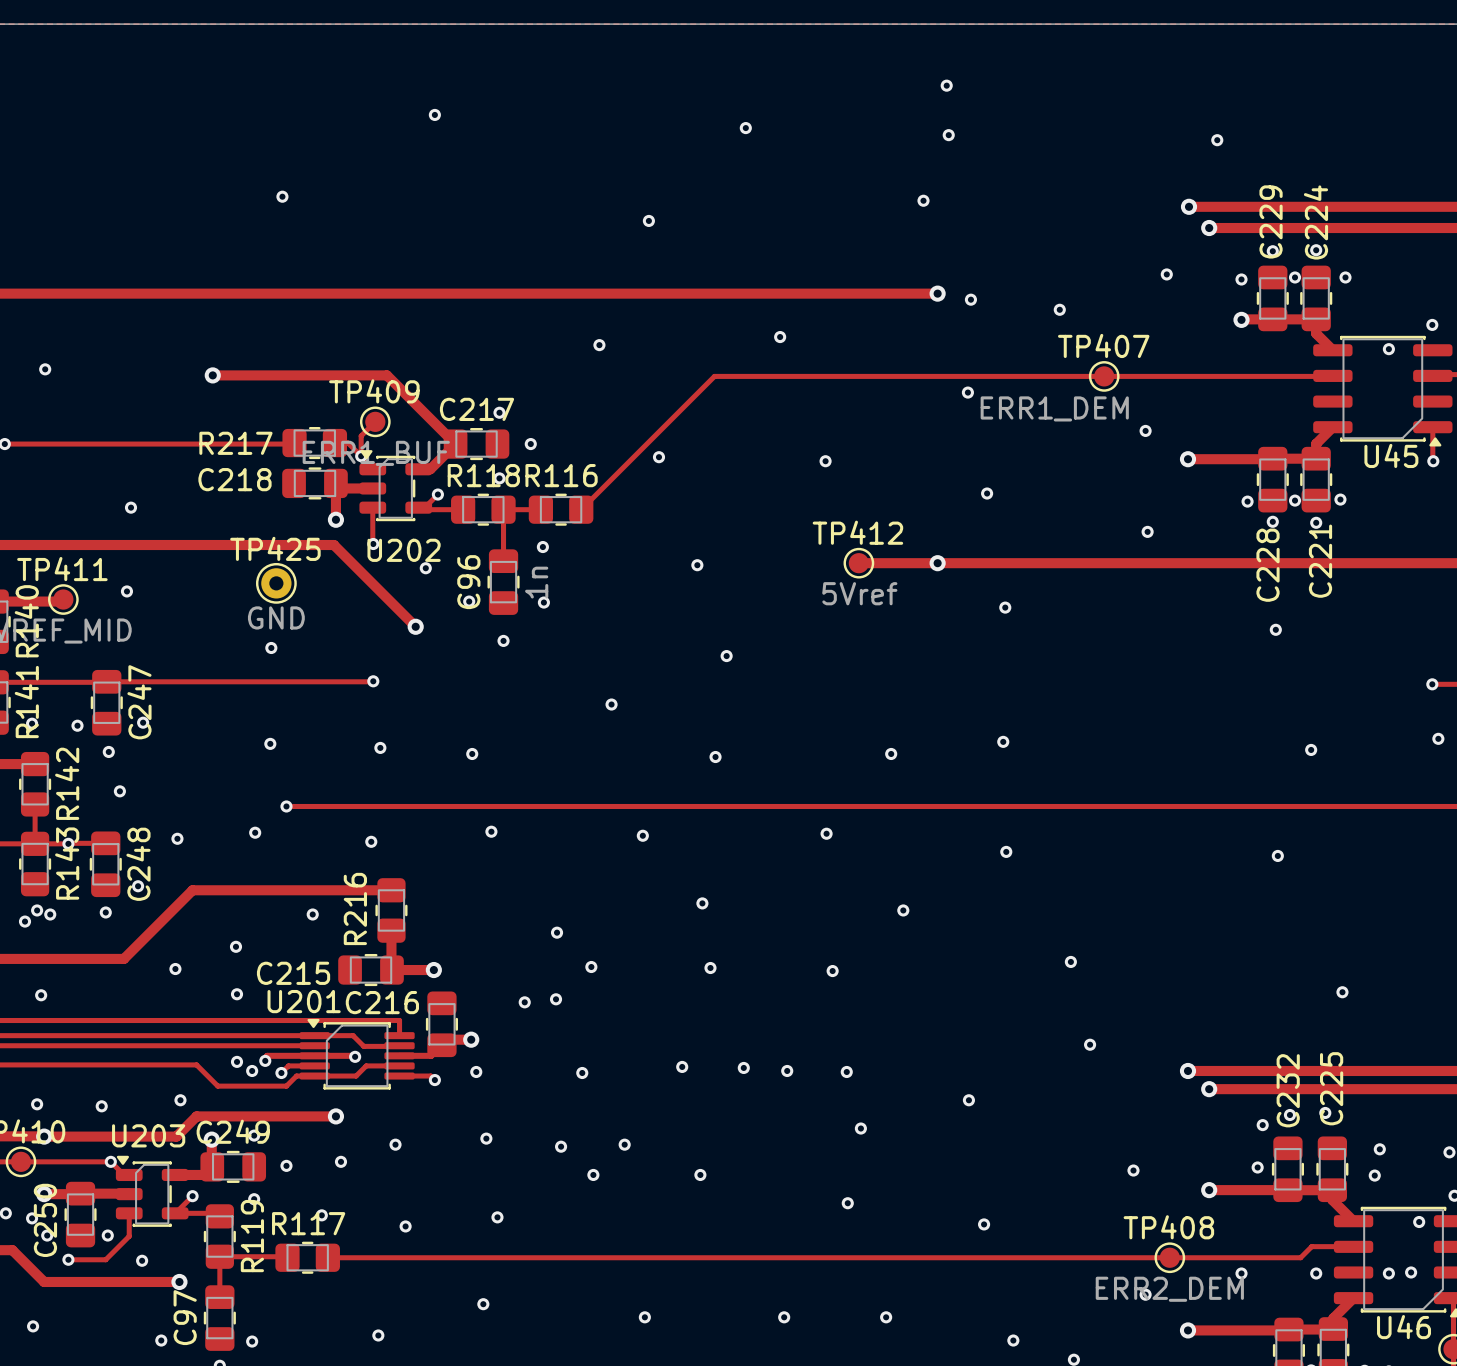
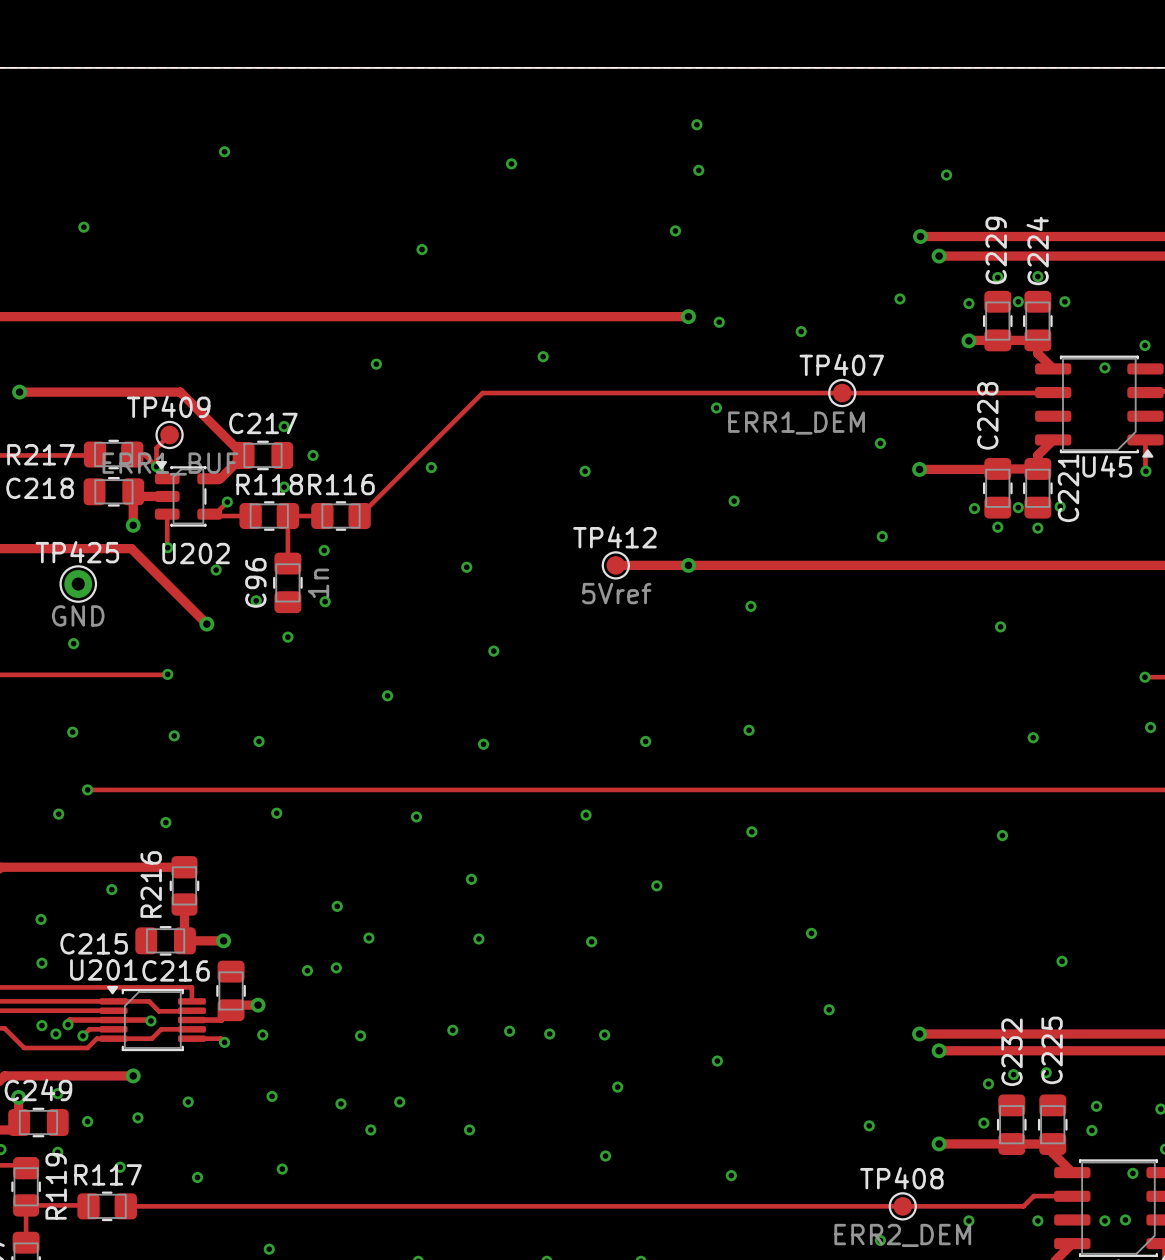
C221 name position: C221 (1320, 561) -> C221 (1068, 488)
C228 name position: C228 (1268, 565) -> C228 (987, 415)

